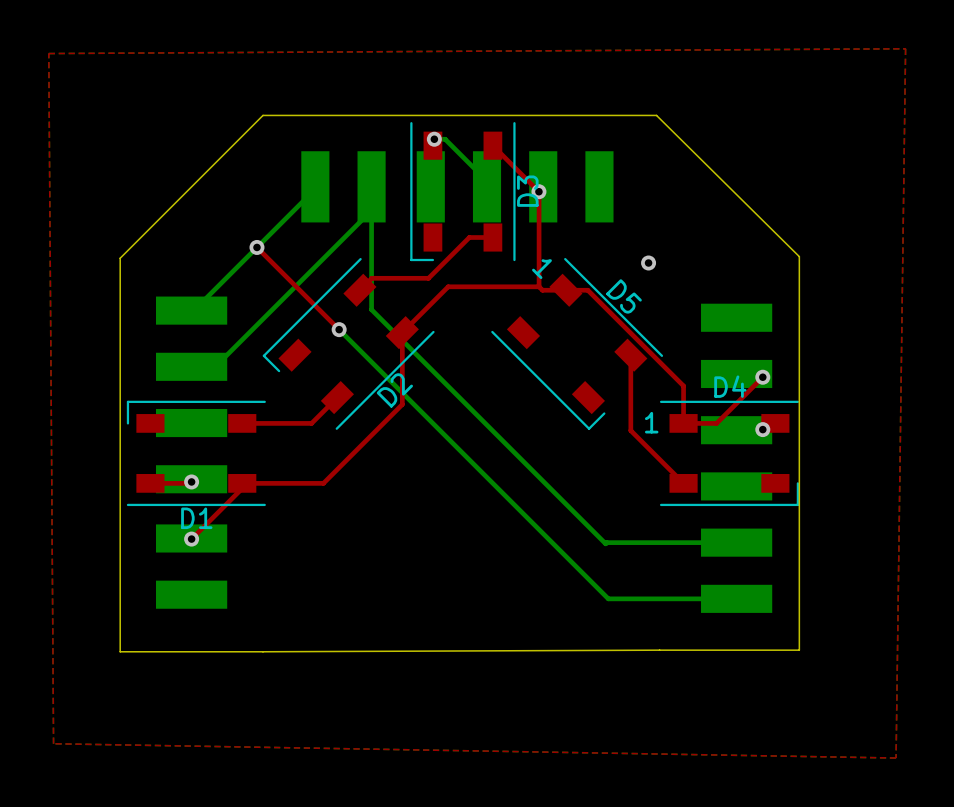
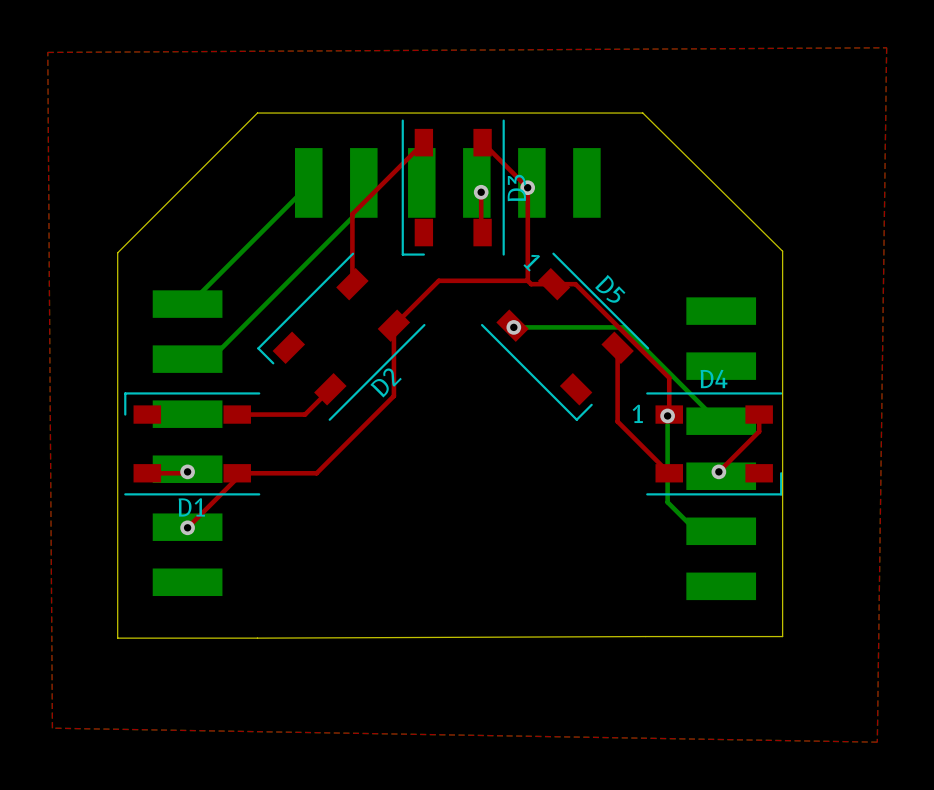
bottom track: (434, 139) (445, 139) (487, 181) (487, 186) -> none
via position: (434, 139) -> (481, 192)
bottom track: (371, 186) (371, 309) (605, 543) (736, 542) -> none
top track: none -> (481, 192) (481, 231)
top track: (492, 237) (469, 237) (428, 278) (371, 278) (359, 290) -> (423, 142) (352, 214) (352, 284)
top track: (256, 247) (339, 329) -> none
via: (256, 247) -> none
via: (648, 263) -> none
bottom track: (339, 329) (608, 598) (736, 598) -> none
via: (339, 329) -> none
bottom track: none -> (513, 327) (623, 327) (718, 422)
via: none -> (513, 327)
top track: (762, 377) (716, 423) (683, 423) -> none
via: (762, 377) -> none
top track: none -> (759, 414) (759, 431) (718, 471)
bottom track: none -> (667, 415) (667, 502) (697, 532)
via: none -> (667, 415)
via: (762, 429) -> none
via: none -> (718, 471)

